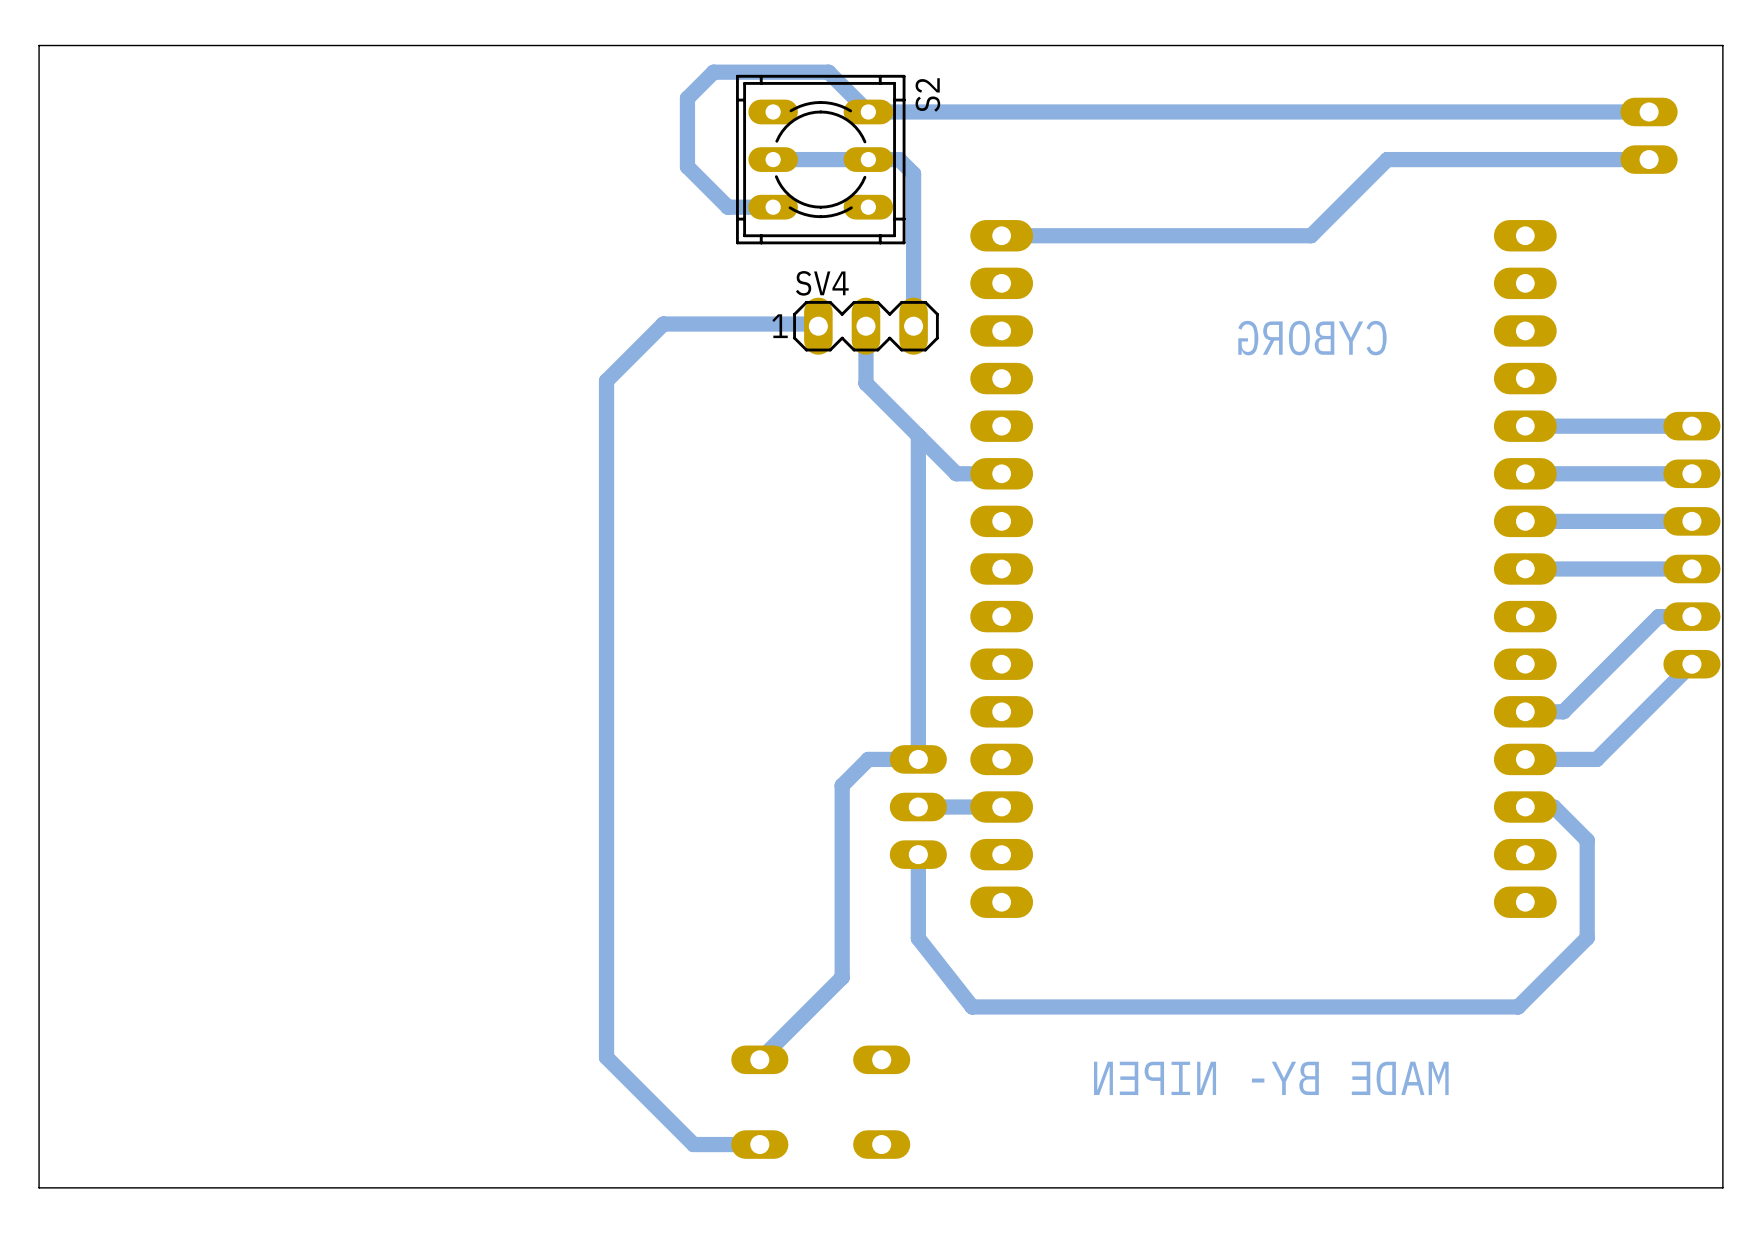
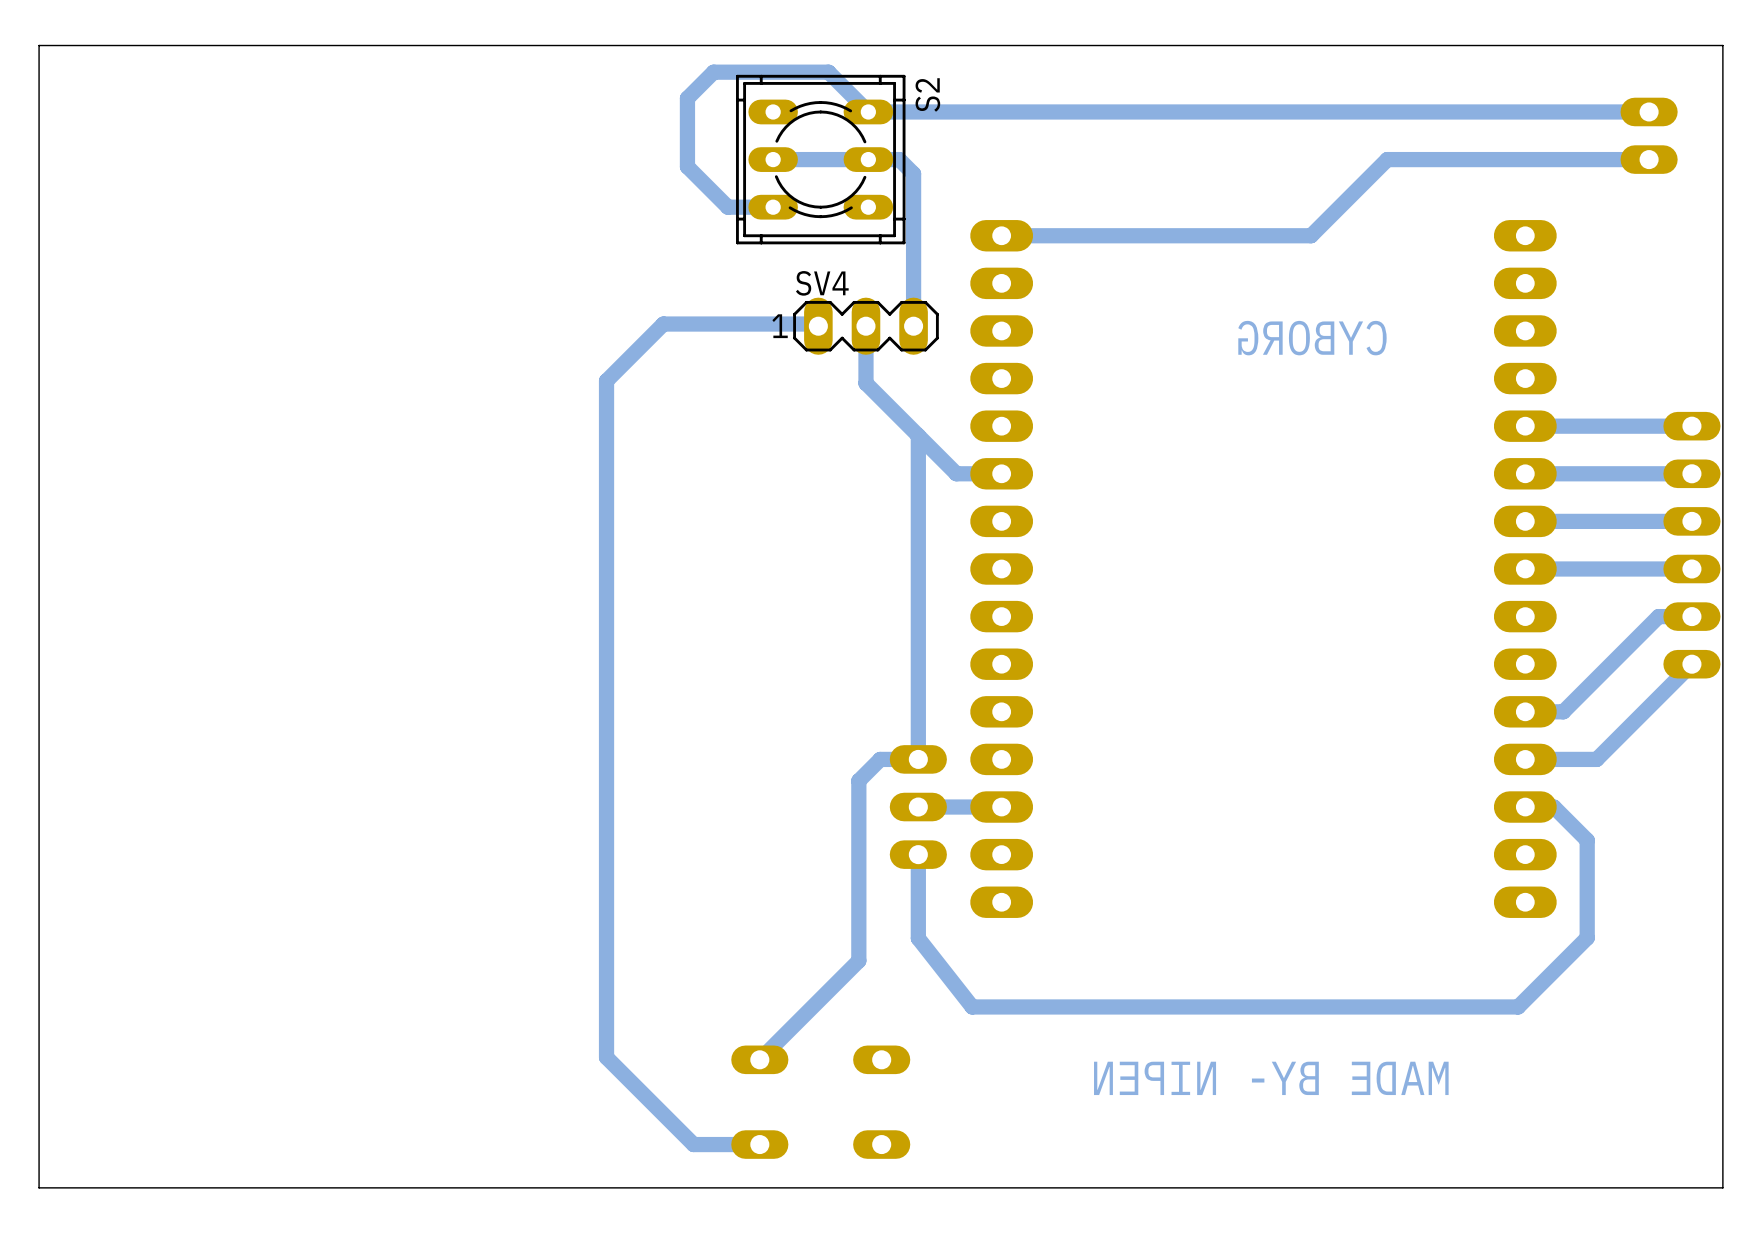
track: (880, 759) (868, 759) (842, 785) (842, 977) -> (880, 759) (858, 780) (858, 960) (842, 977)

